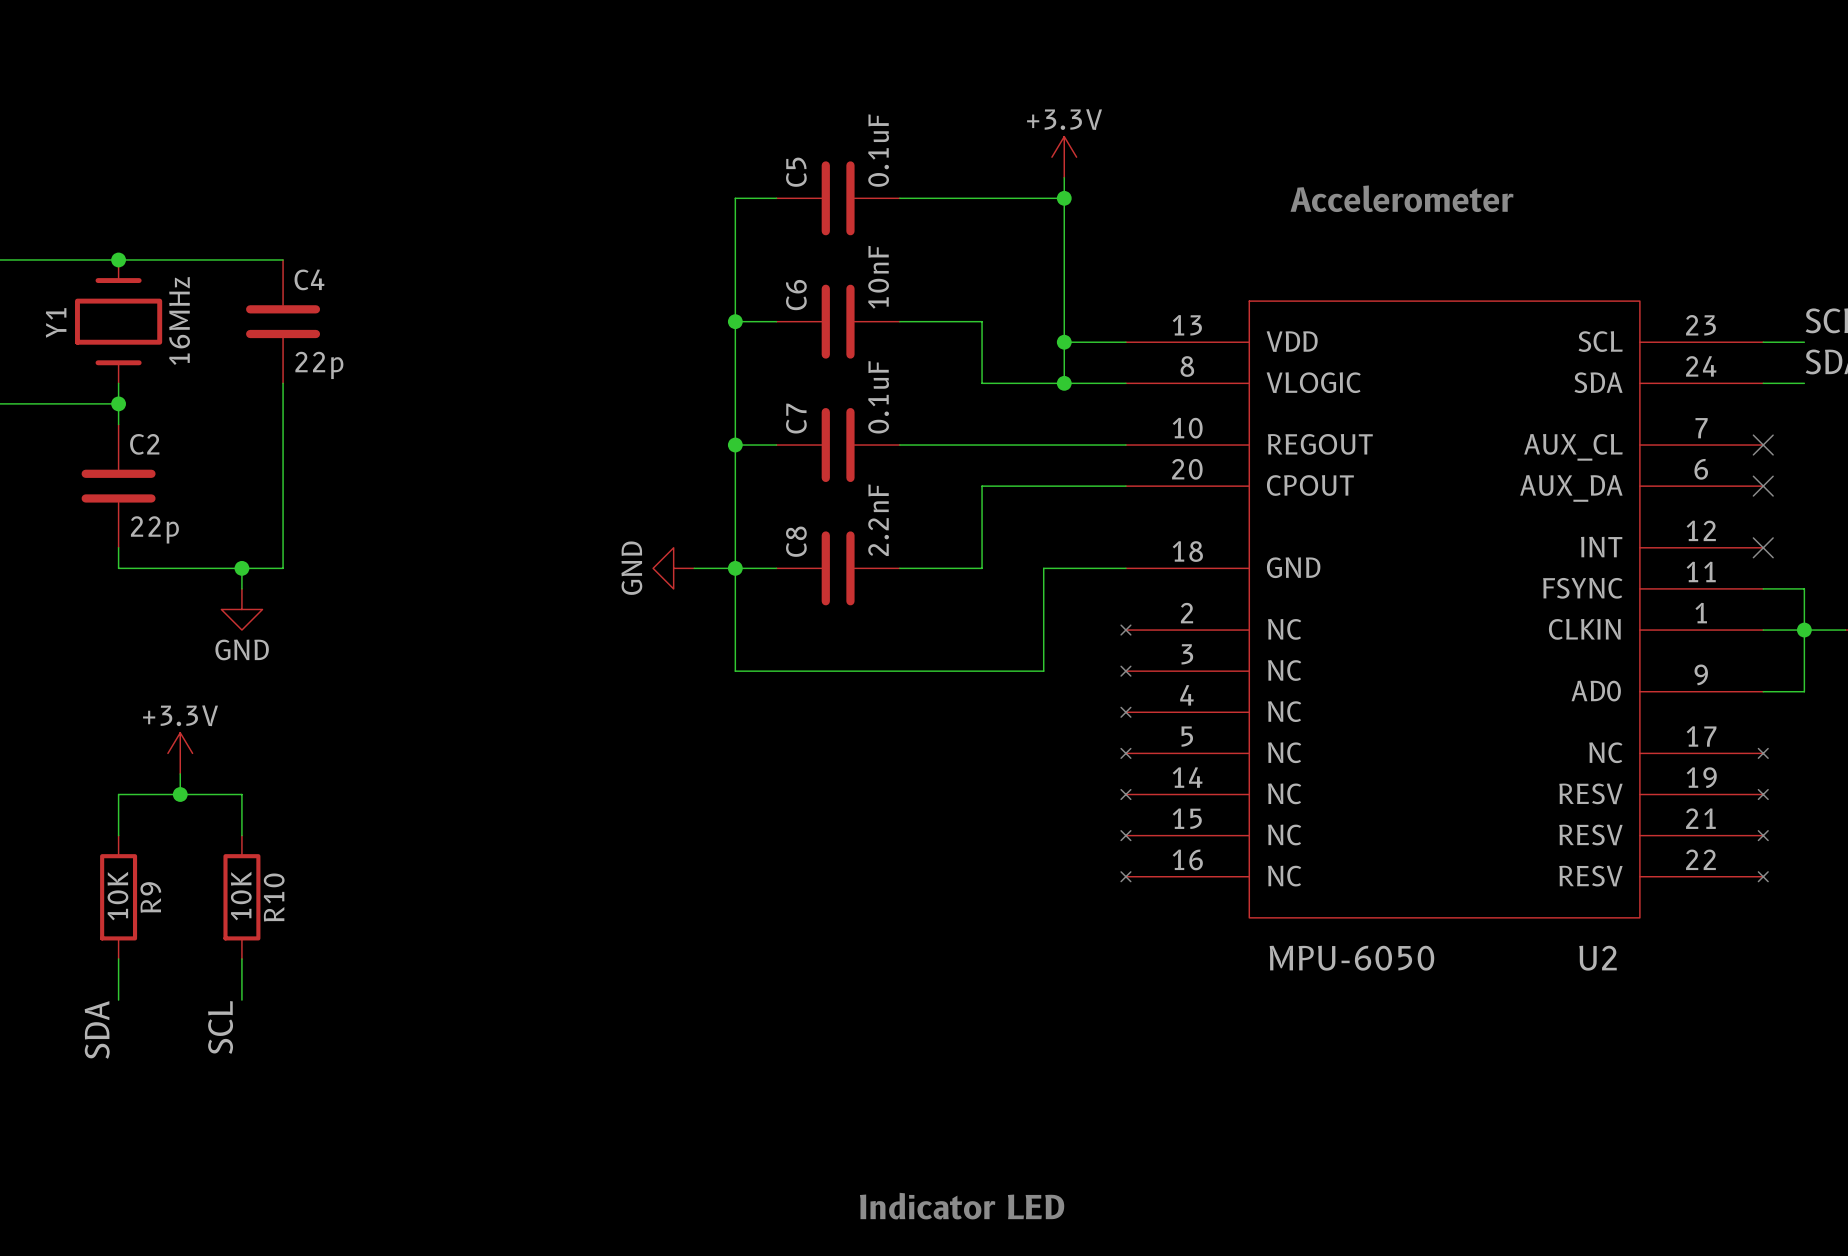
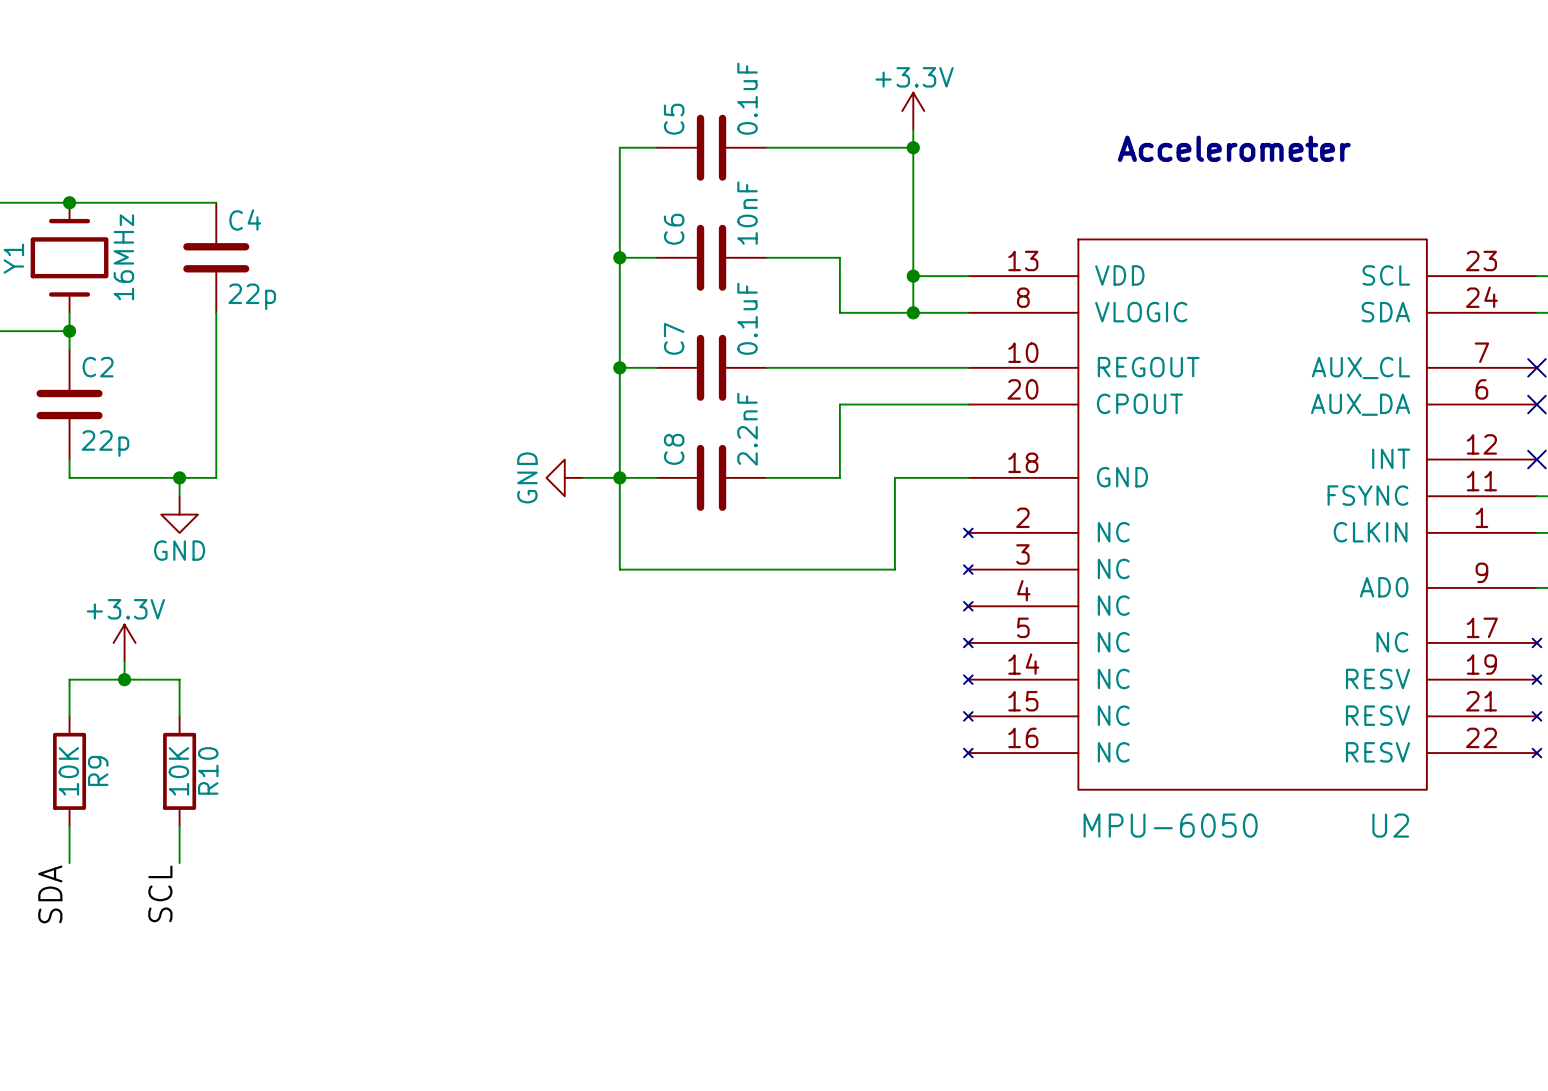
text: Indicator LED (962, 1206) -> none

